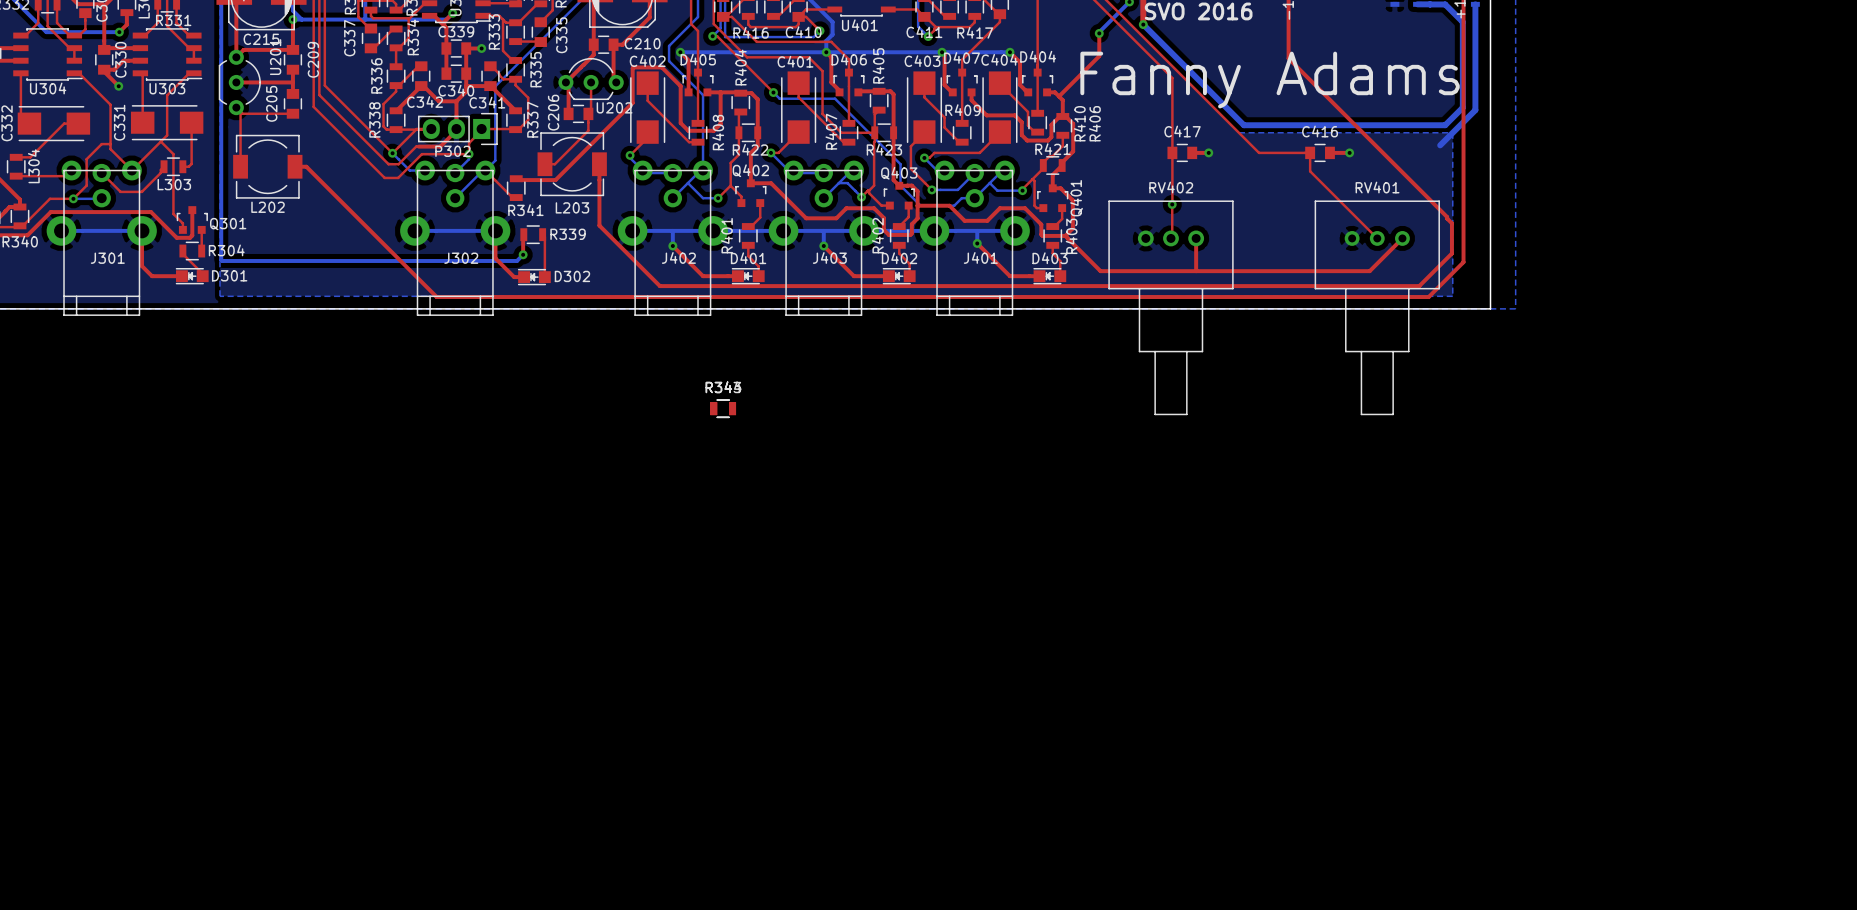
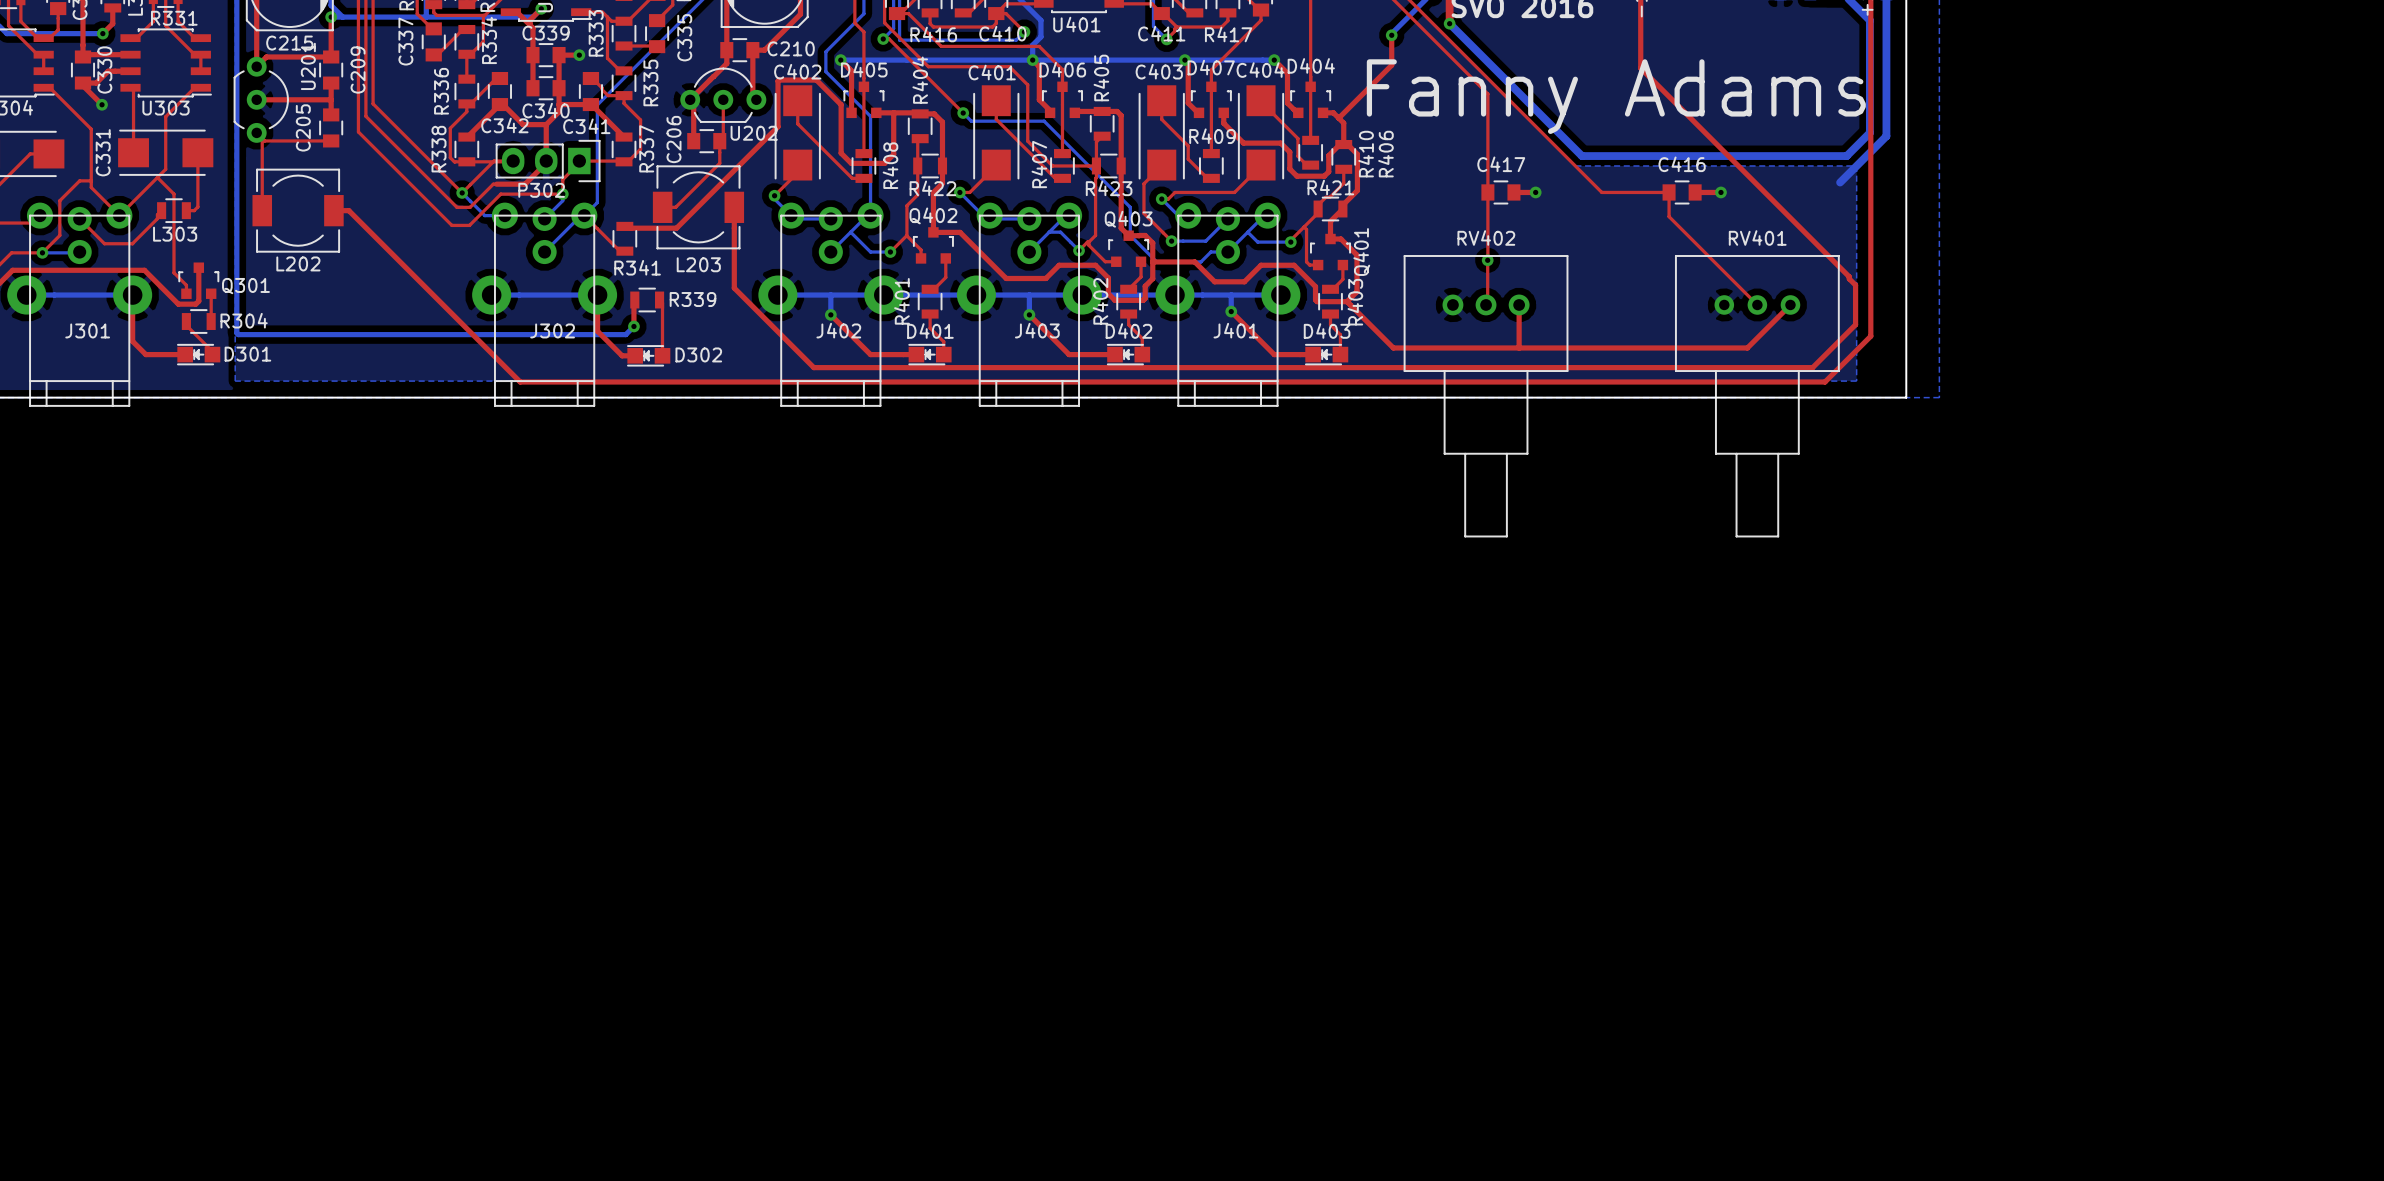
part: (723, 408) -> none
part: (723, 408) -> none

